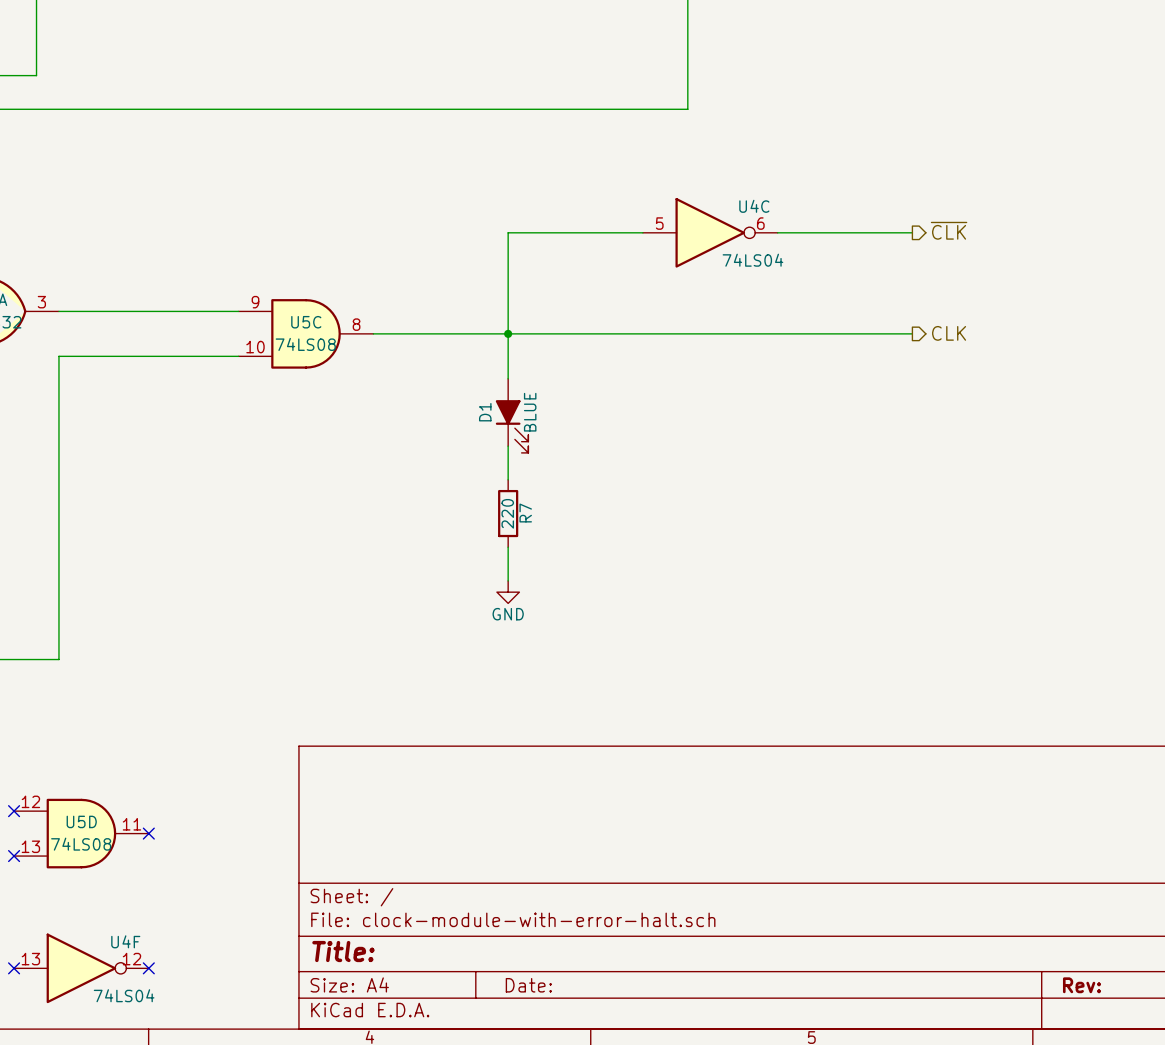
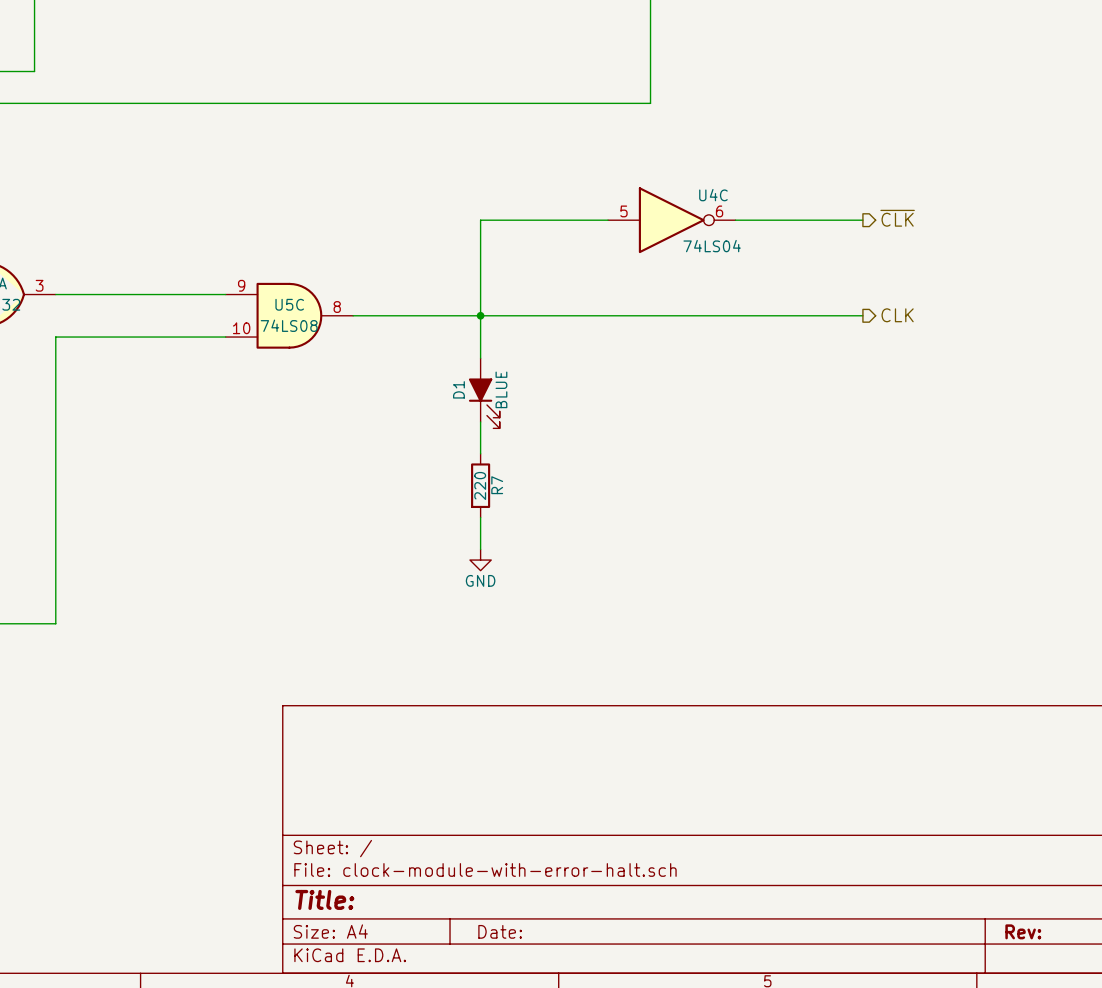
no-connect mark: (14, 811) -> none
U5D: 74LS08 (81, 833) -> none
no-connect mark: (148, 833) -> none
no-connect mark: (14, 856) -> none
no-connect mark: (14, 968) -> none
U4F: 74LS04 (81, 968) -> none
no-connect mark: (148, 968) -> none

